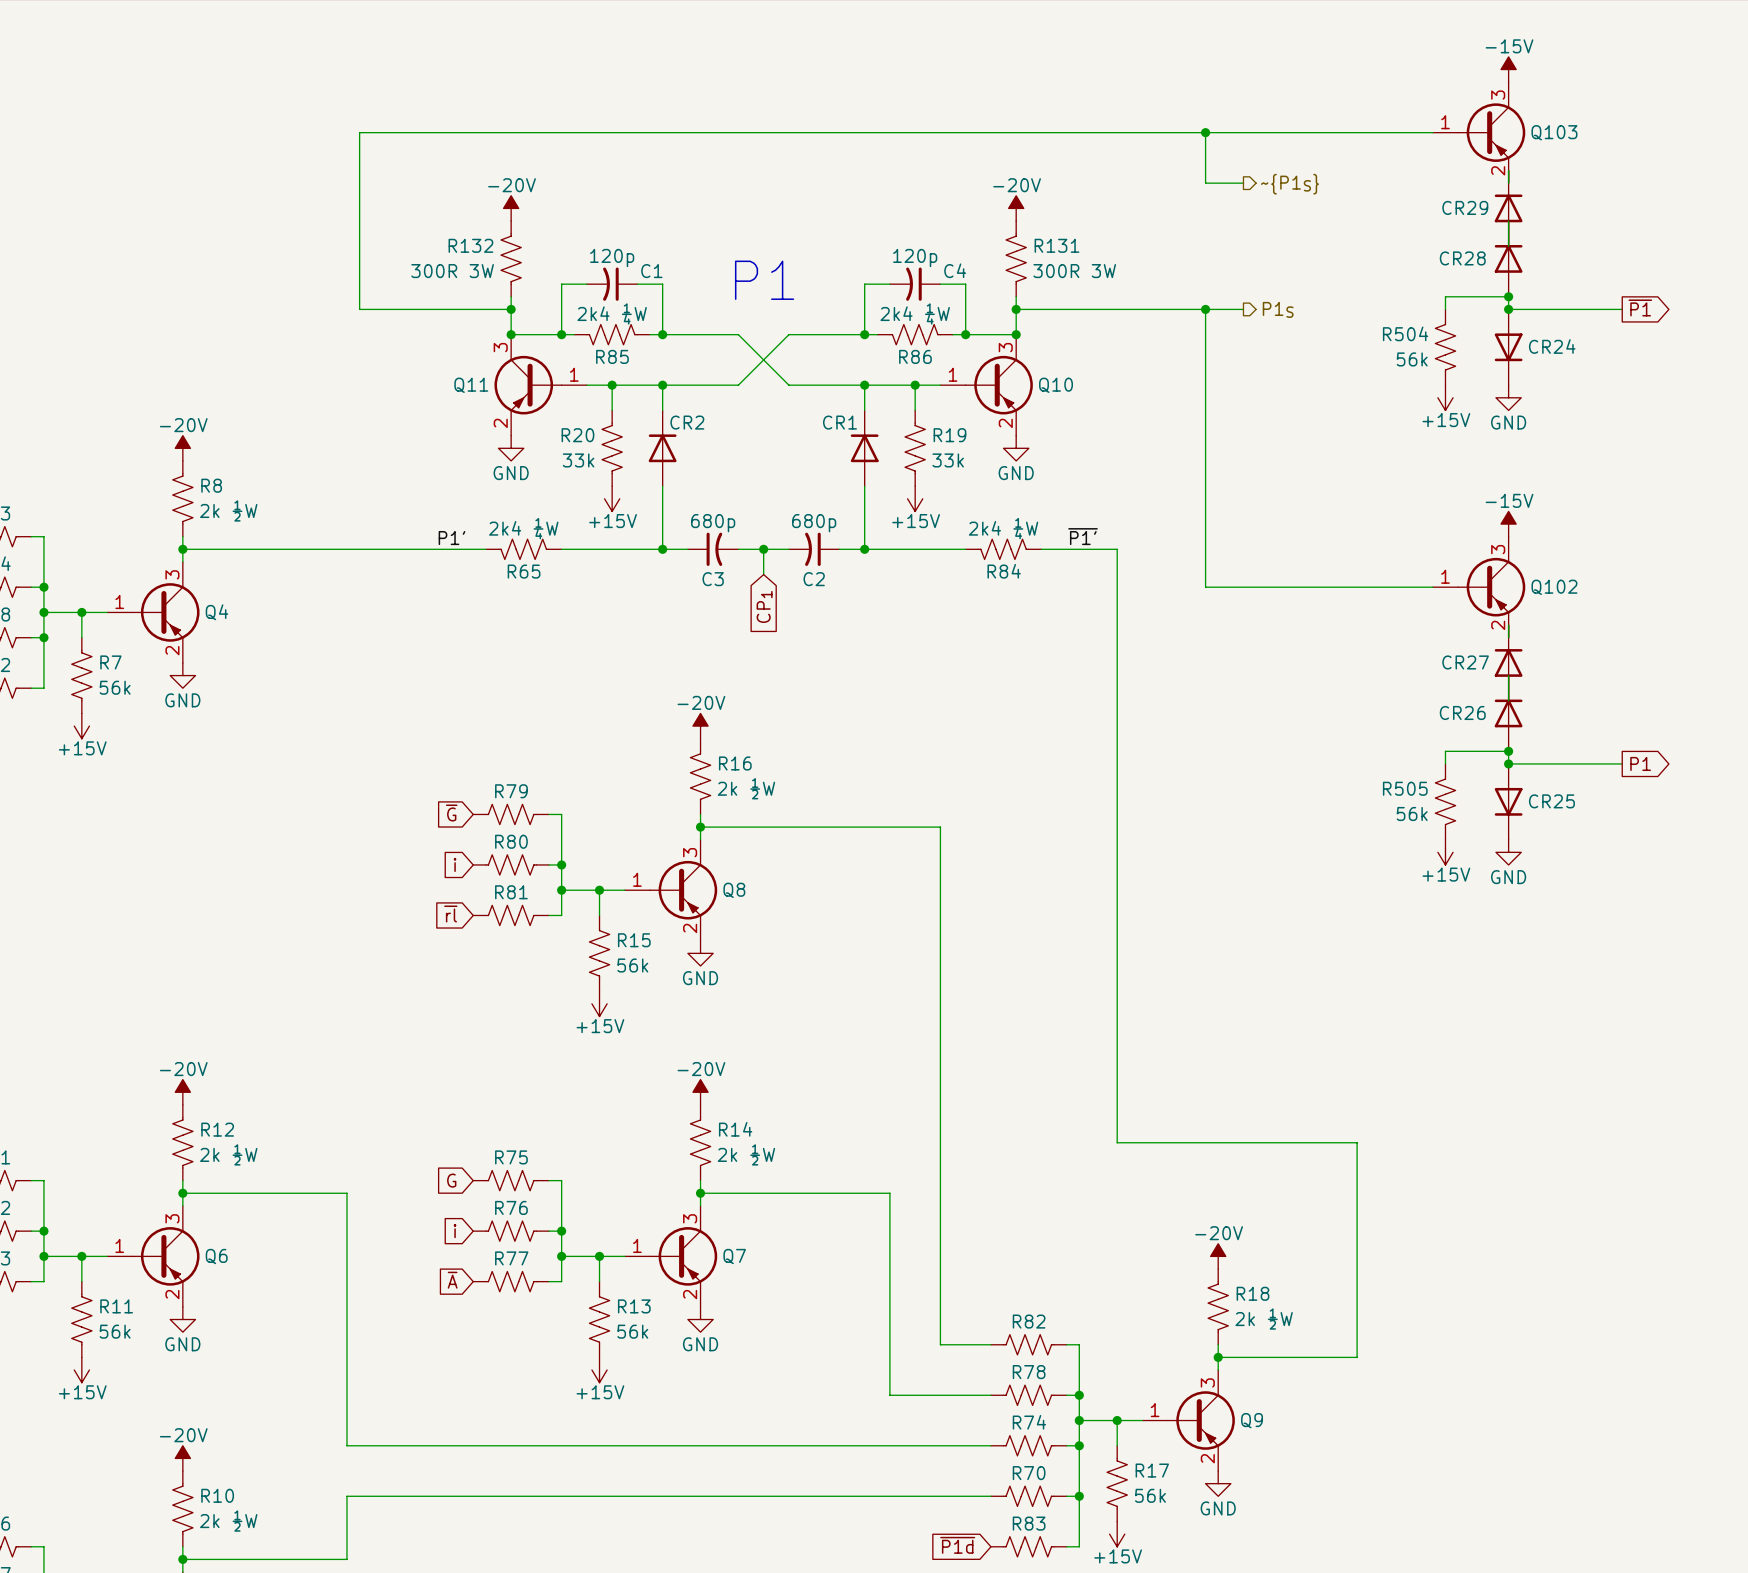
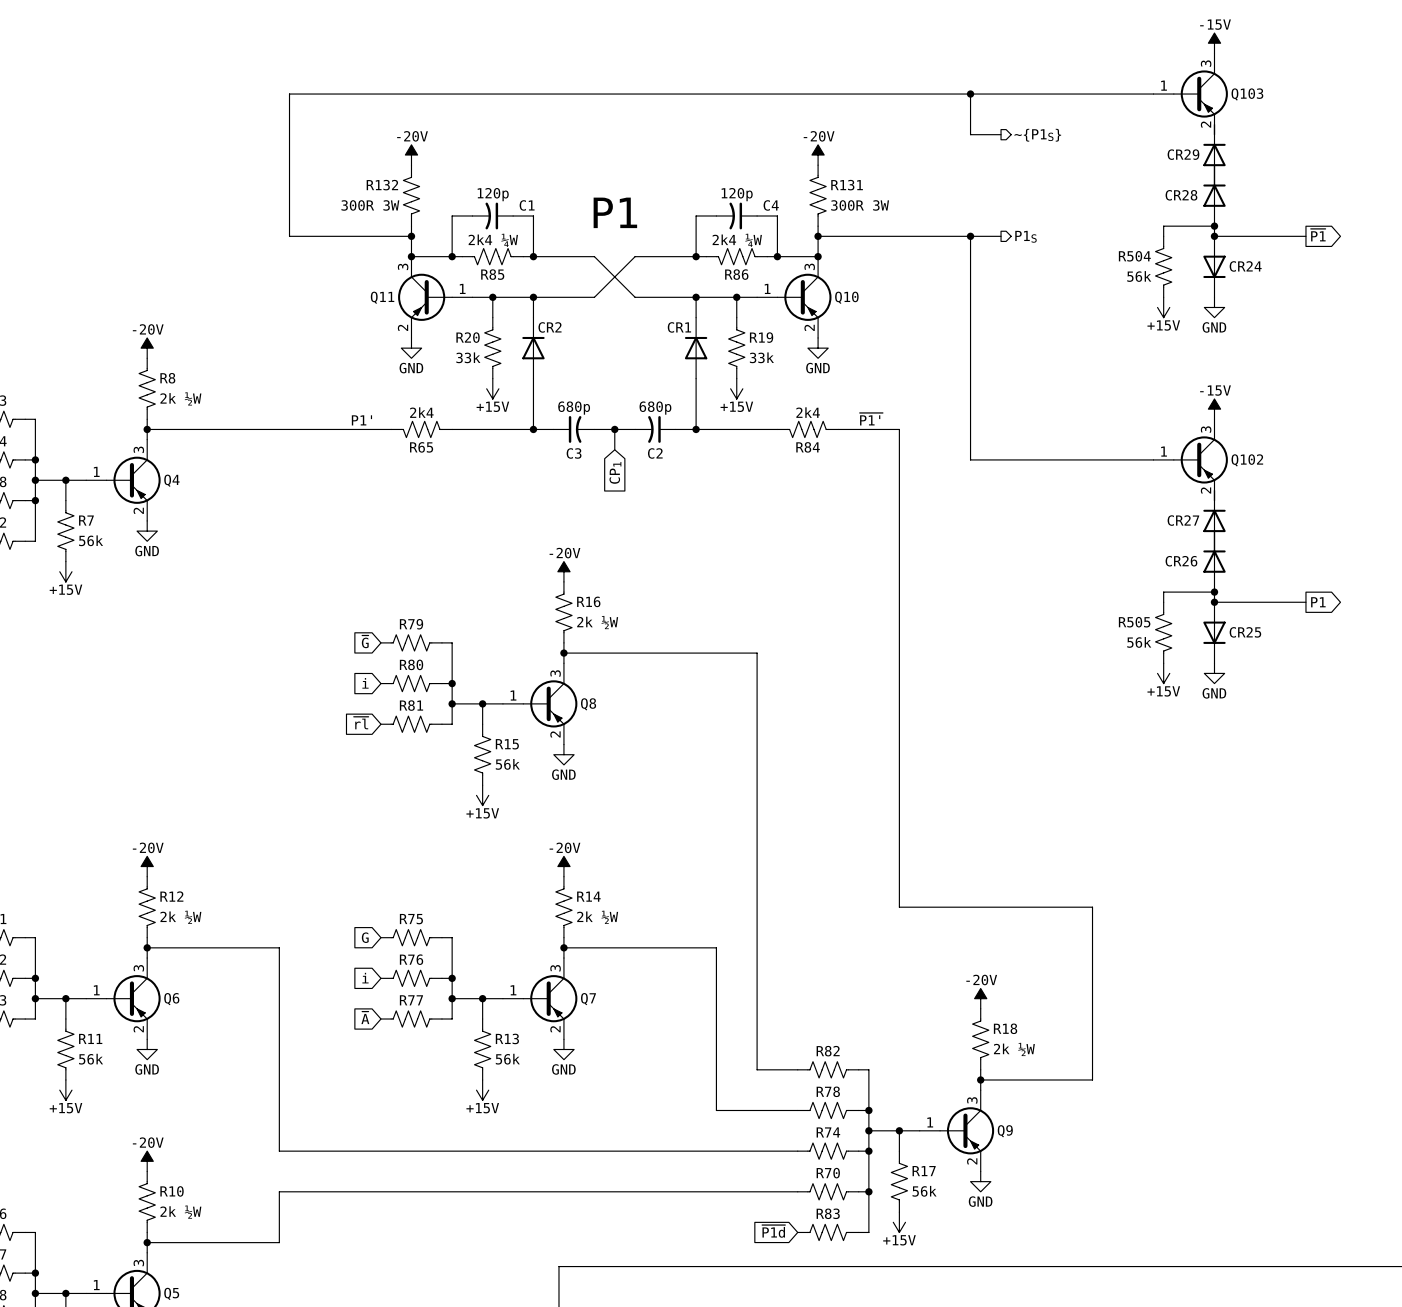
R65 value: 2k4 ¼W (523, 528) -> 2k4 (421, 412)
R84 value: 2k4 ¼W (1003, 528) -> 2k4 (808, 412)

